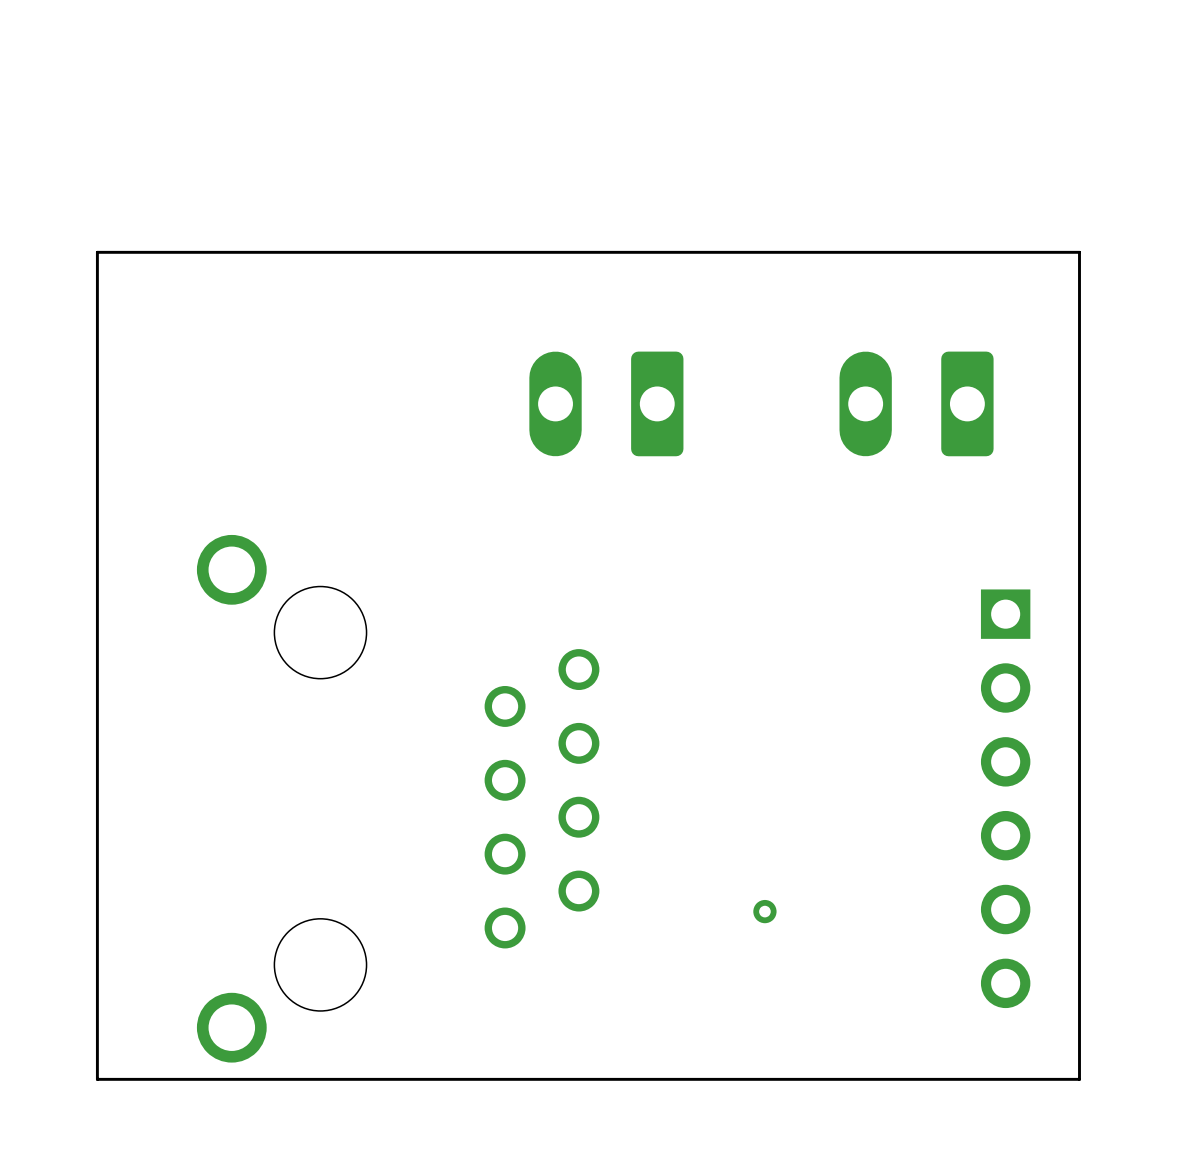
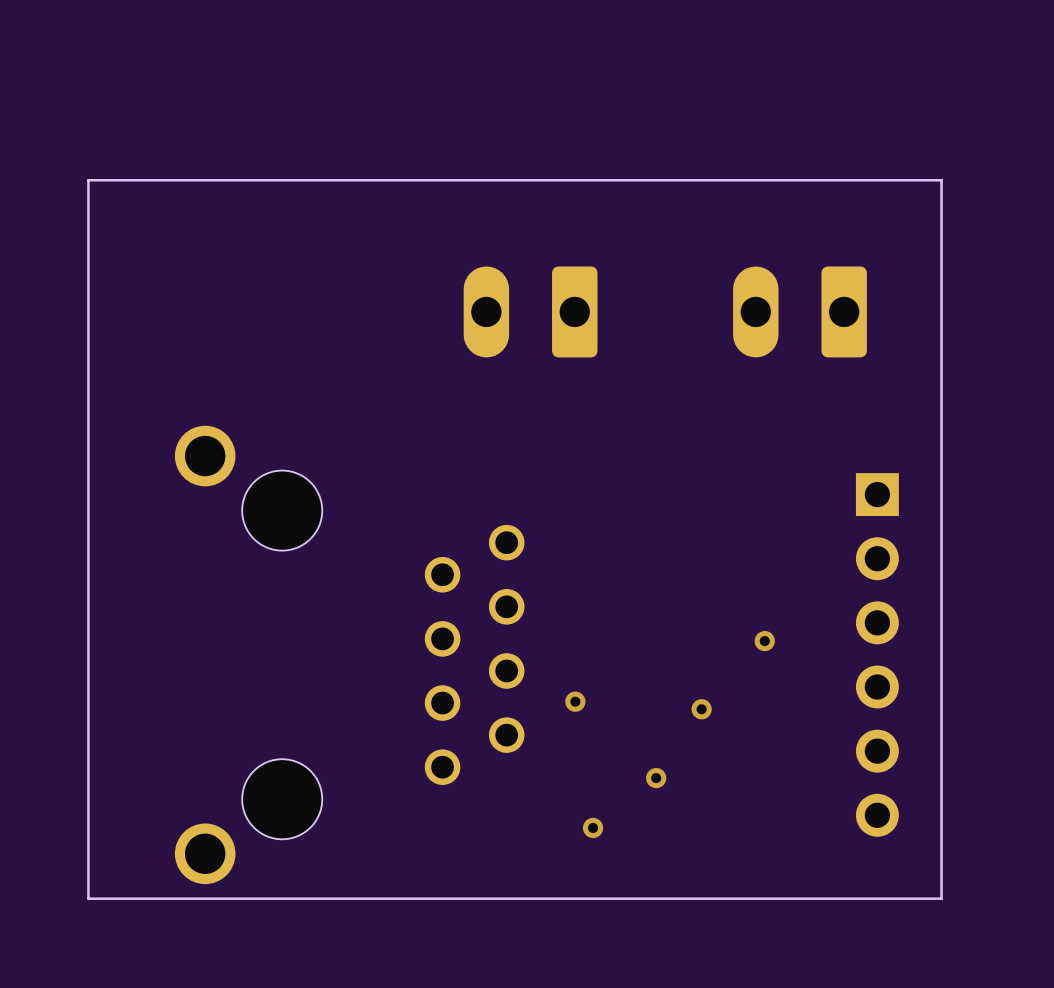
via: none -> (764, 641)
via: none -> (575, 701)
via: none -> (701, 709)
via: (764, 911) -> none
via: none -> (656, 778)
via: none -> (593, 827)

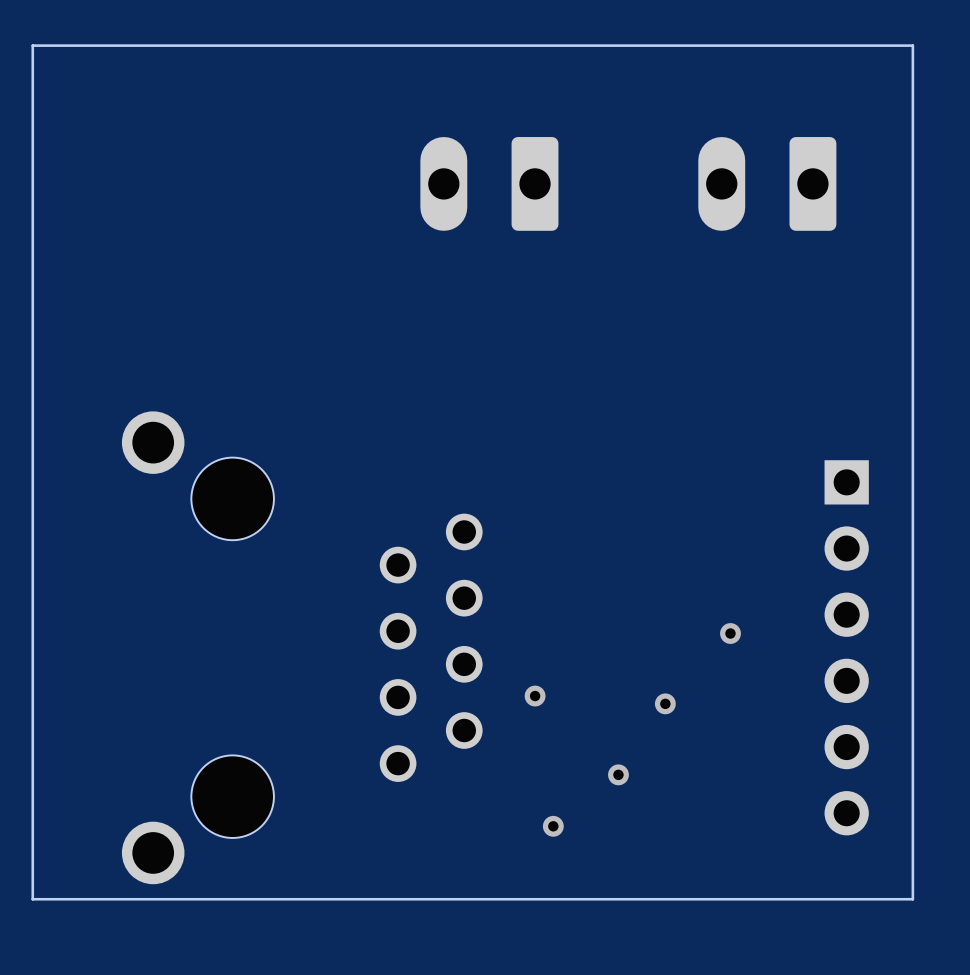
board edge: (941, 180) (88, 180) -> (912, 158) (912, 45) (32, 45) (32, 158)
part position: (530, 311) -> (489, 183)
part position: (799, 311) -> (767, 183)

